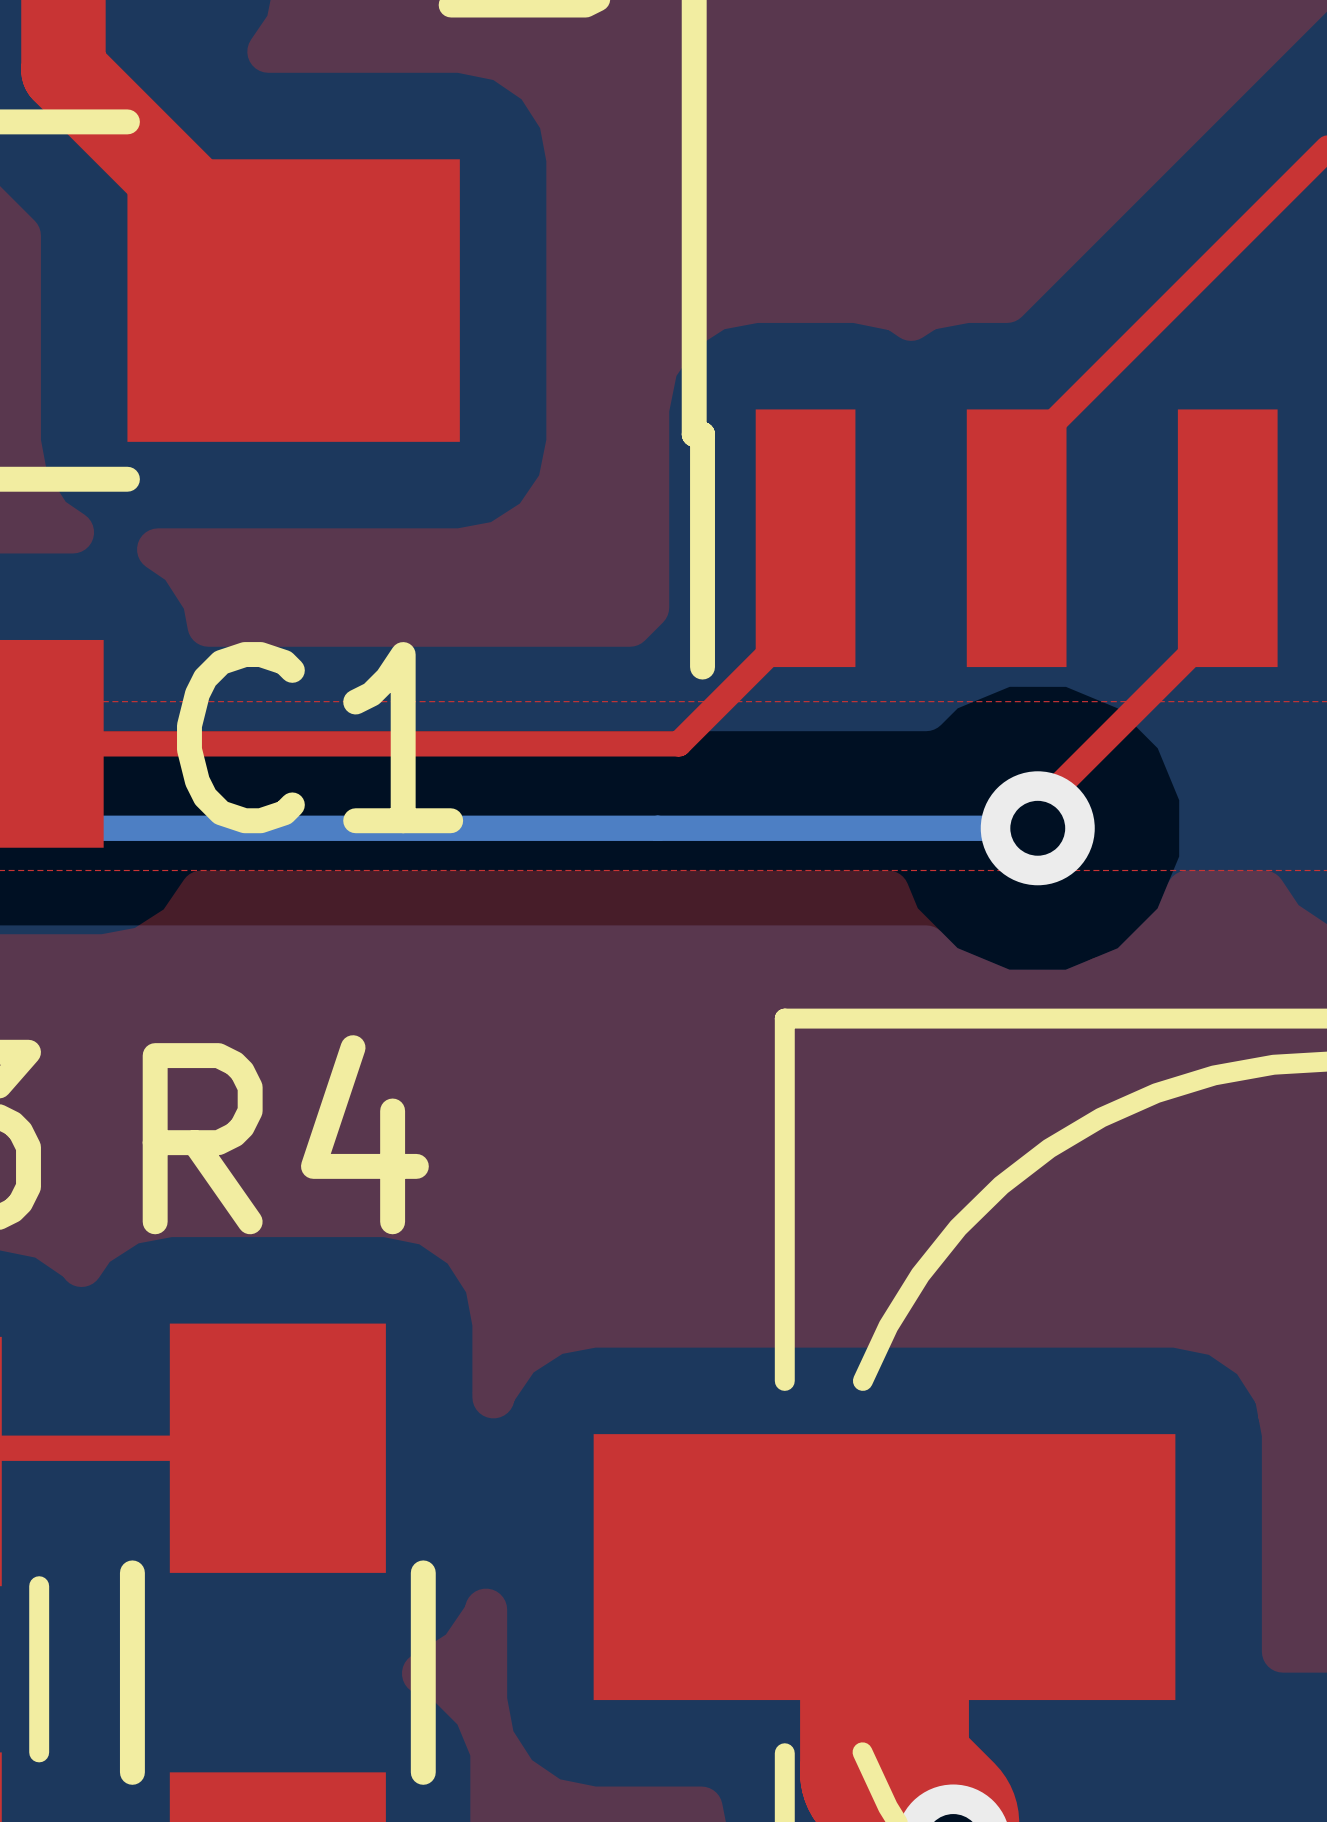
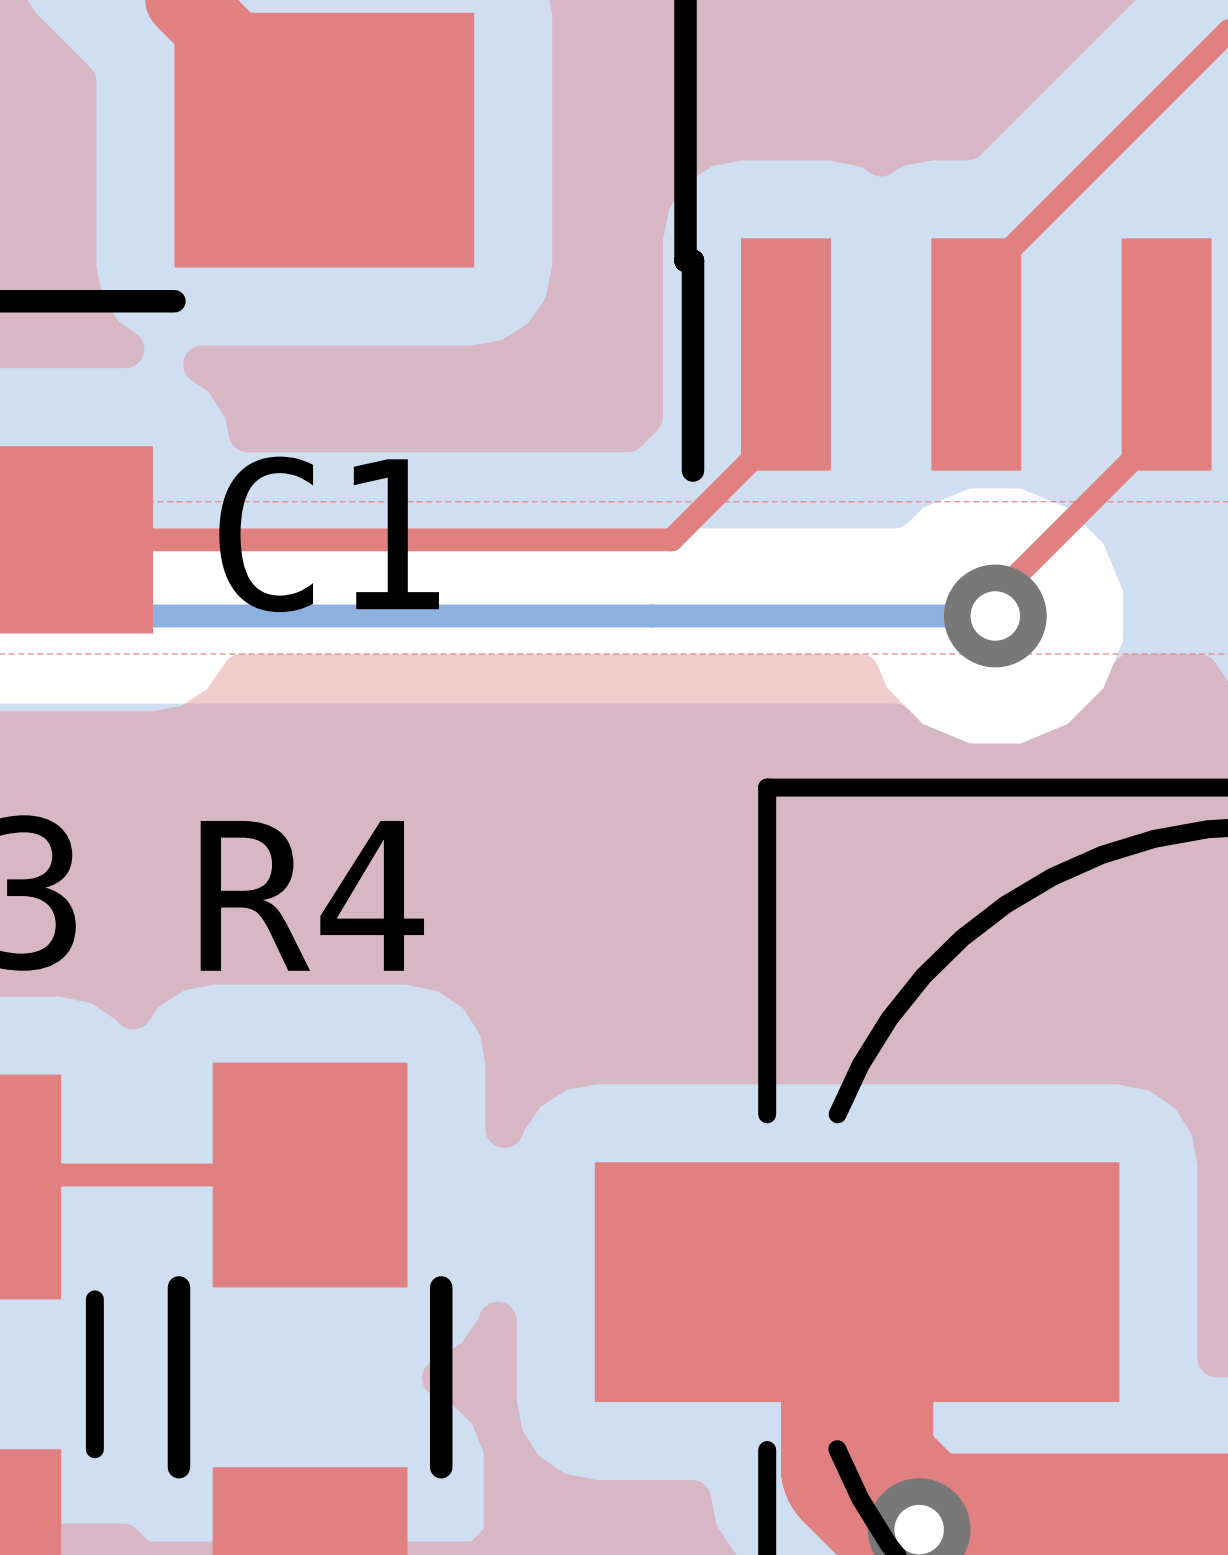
C1 name position: C1 (320, 737) -> C1 (329, 534)

